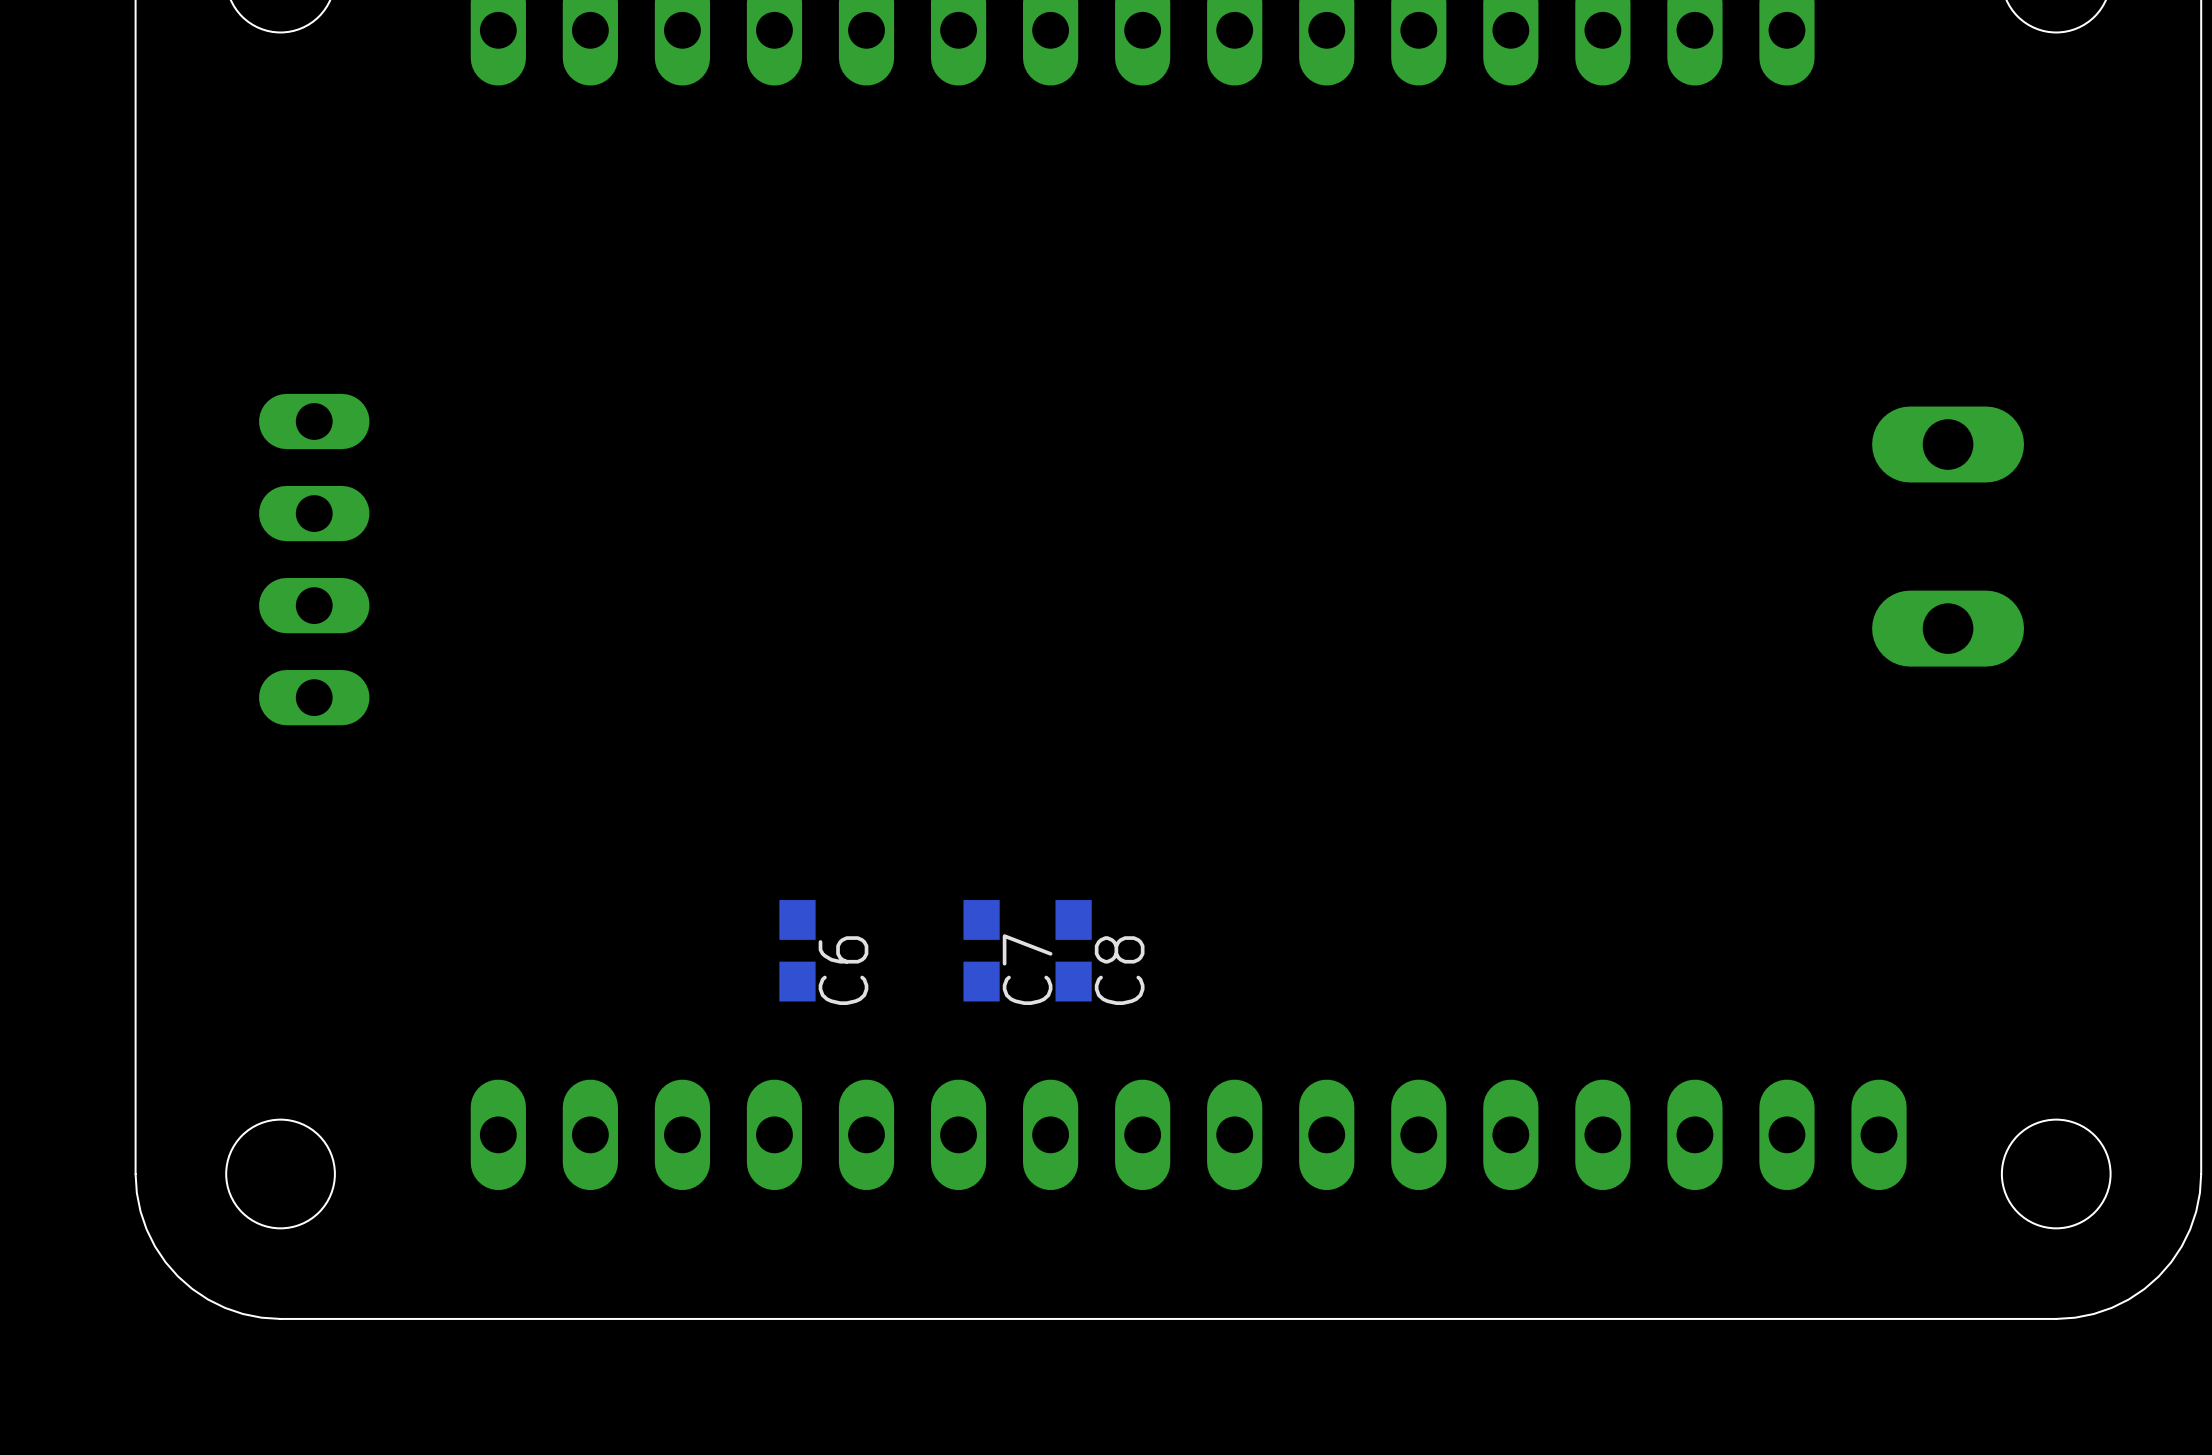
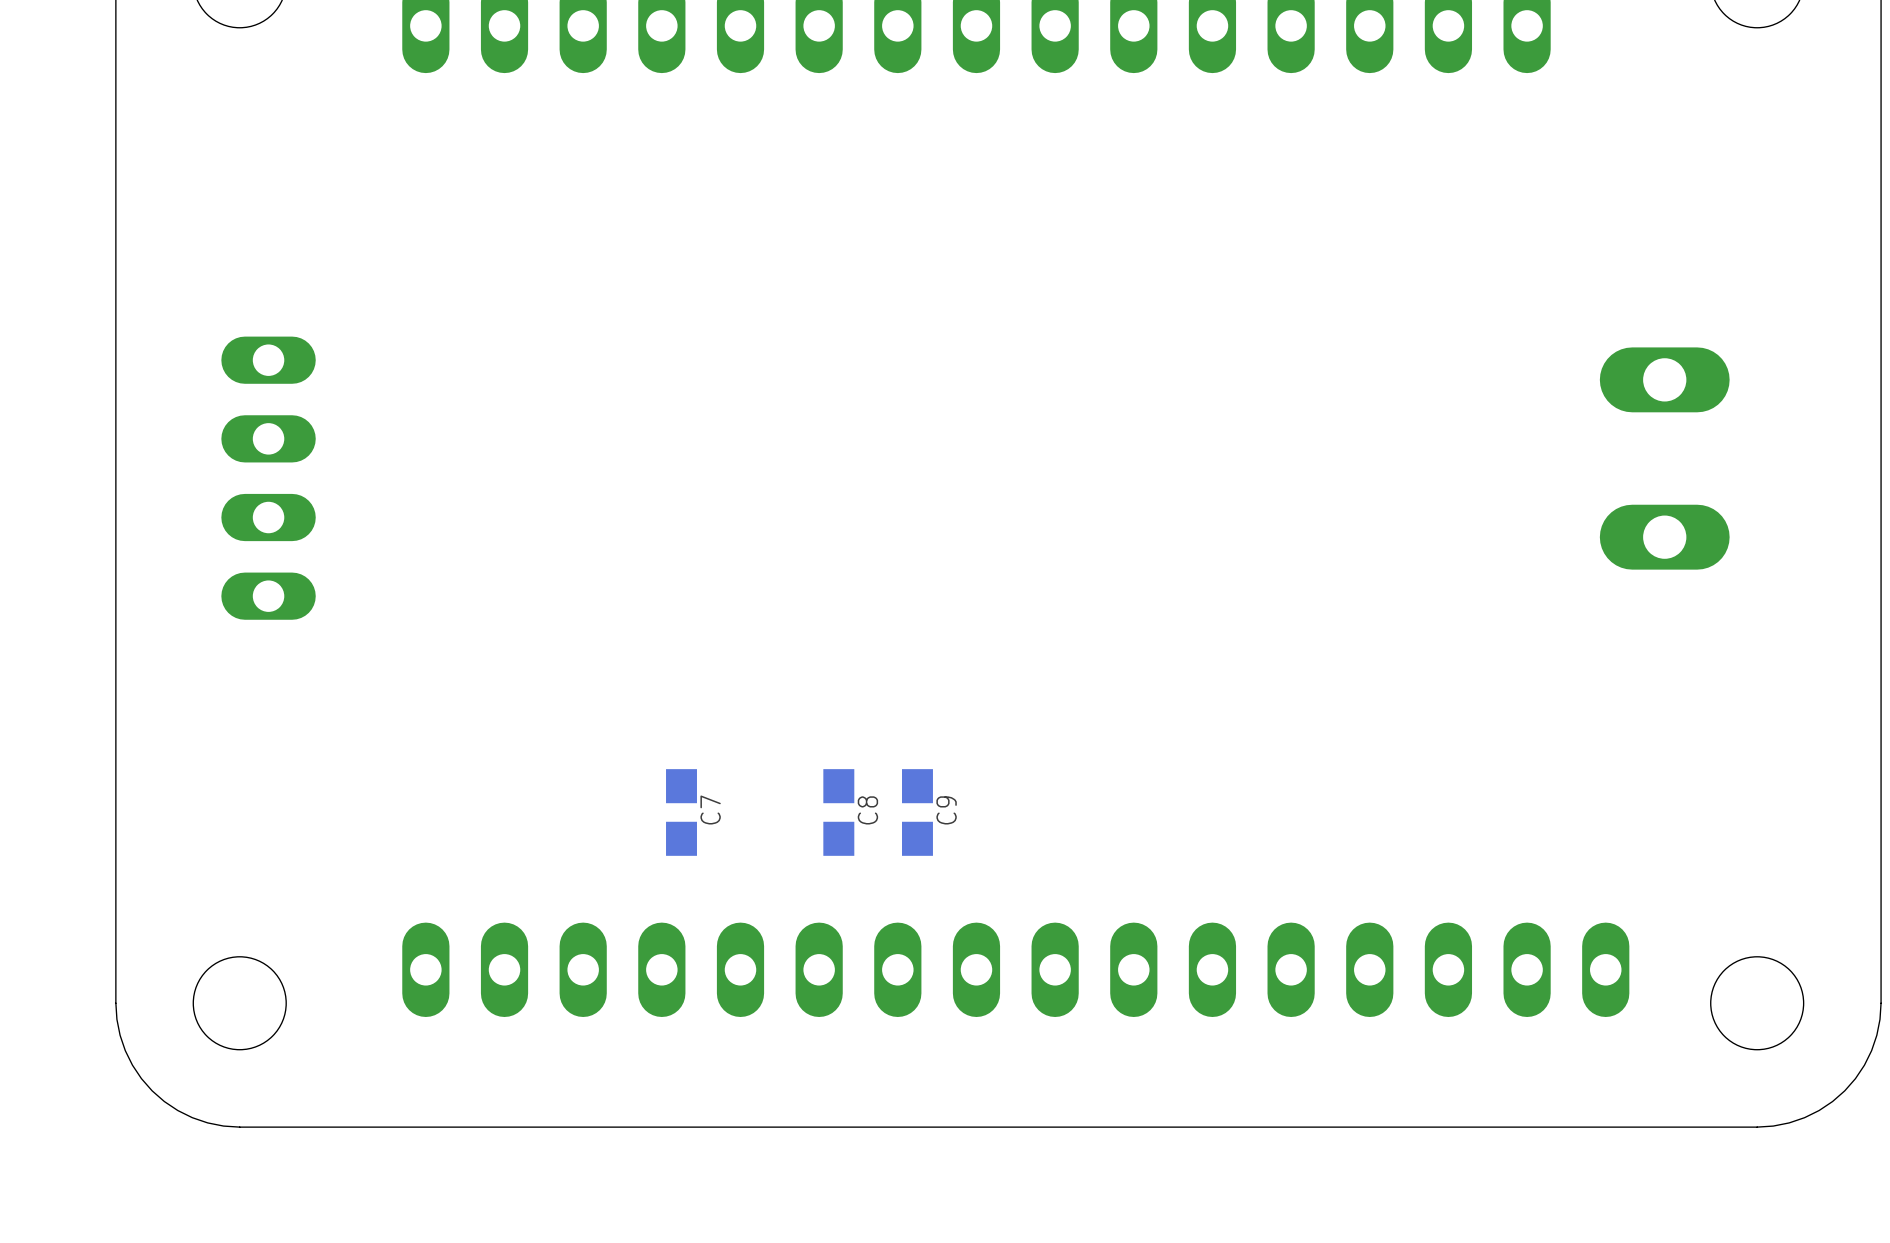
C7 name: C7 (1027, 969) -> C8 (867, 810)
C6 name: C6 (843, 970) -> C7 (710, 809)
C8 name: C8 (1119, 970) -> C9 (946, 810)

